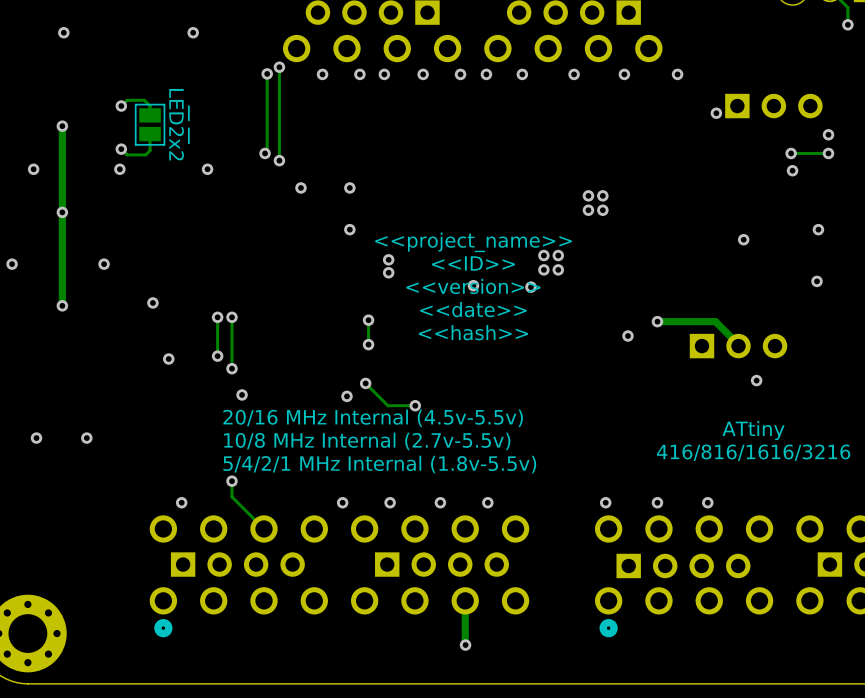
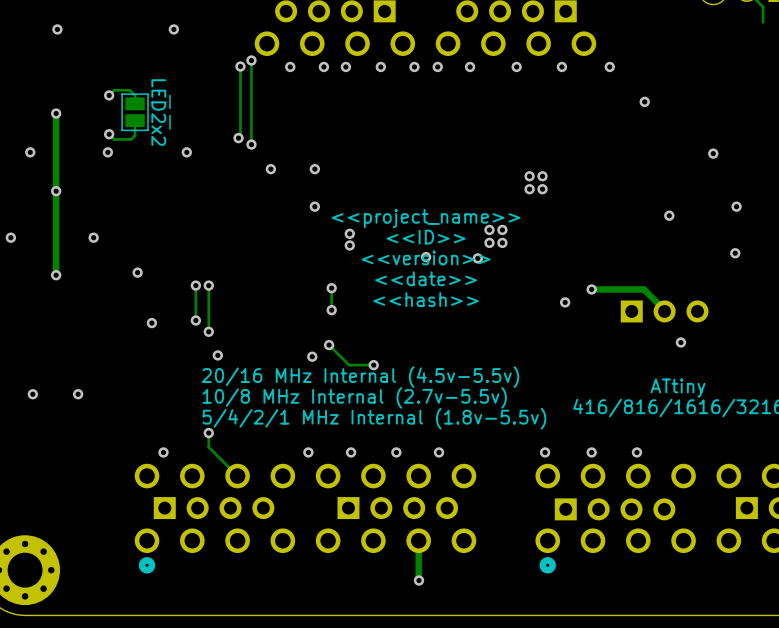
via: (847, 24) -> none
part: (773, 106) -> none
via: (828, 134) -> none
via: (791, 153) -> none
track: (828, 153) (793, 153) -> none
via: (828, 153) -> none

